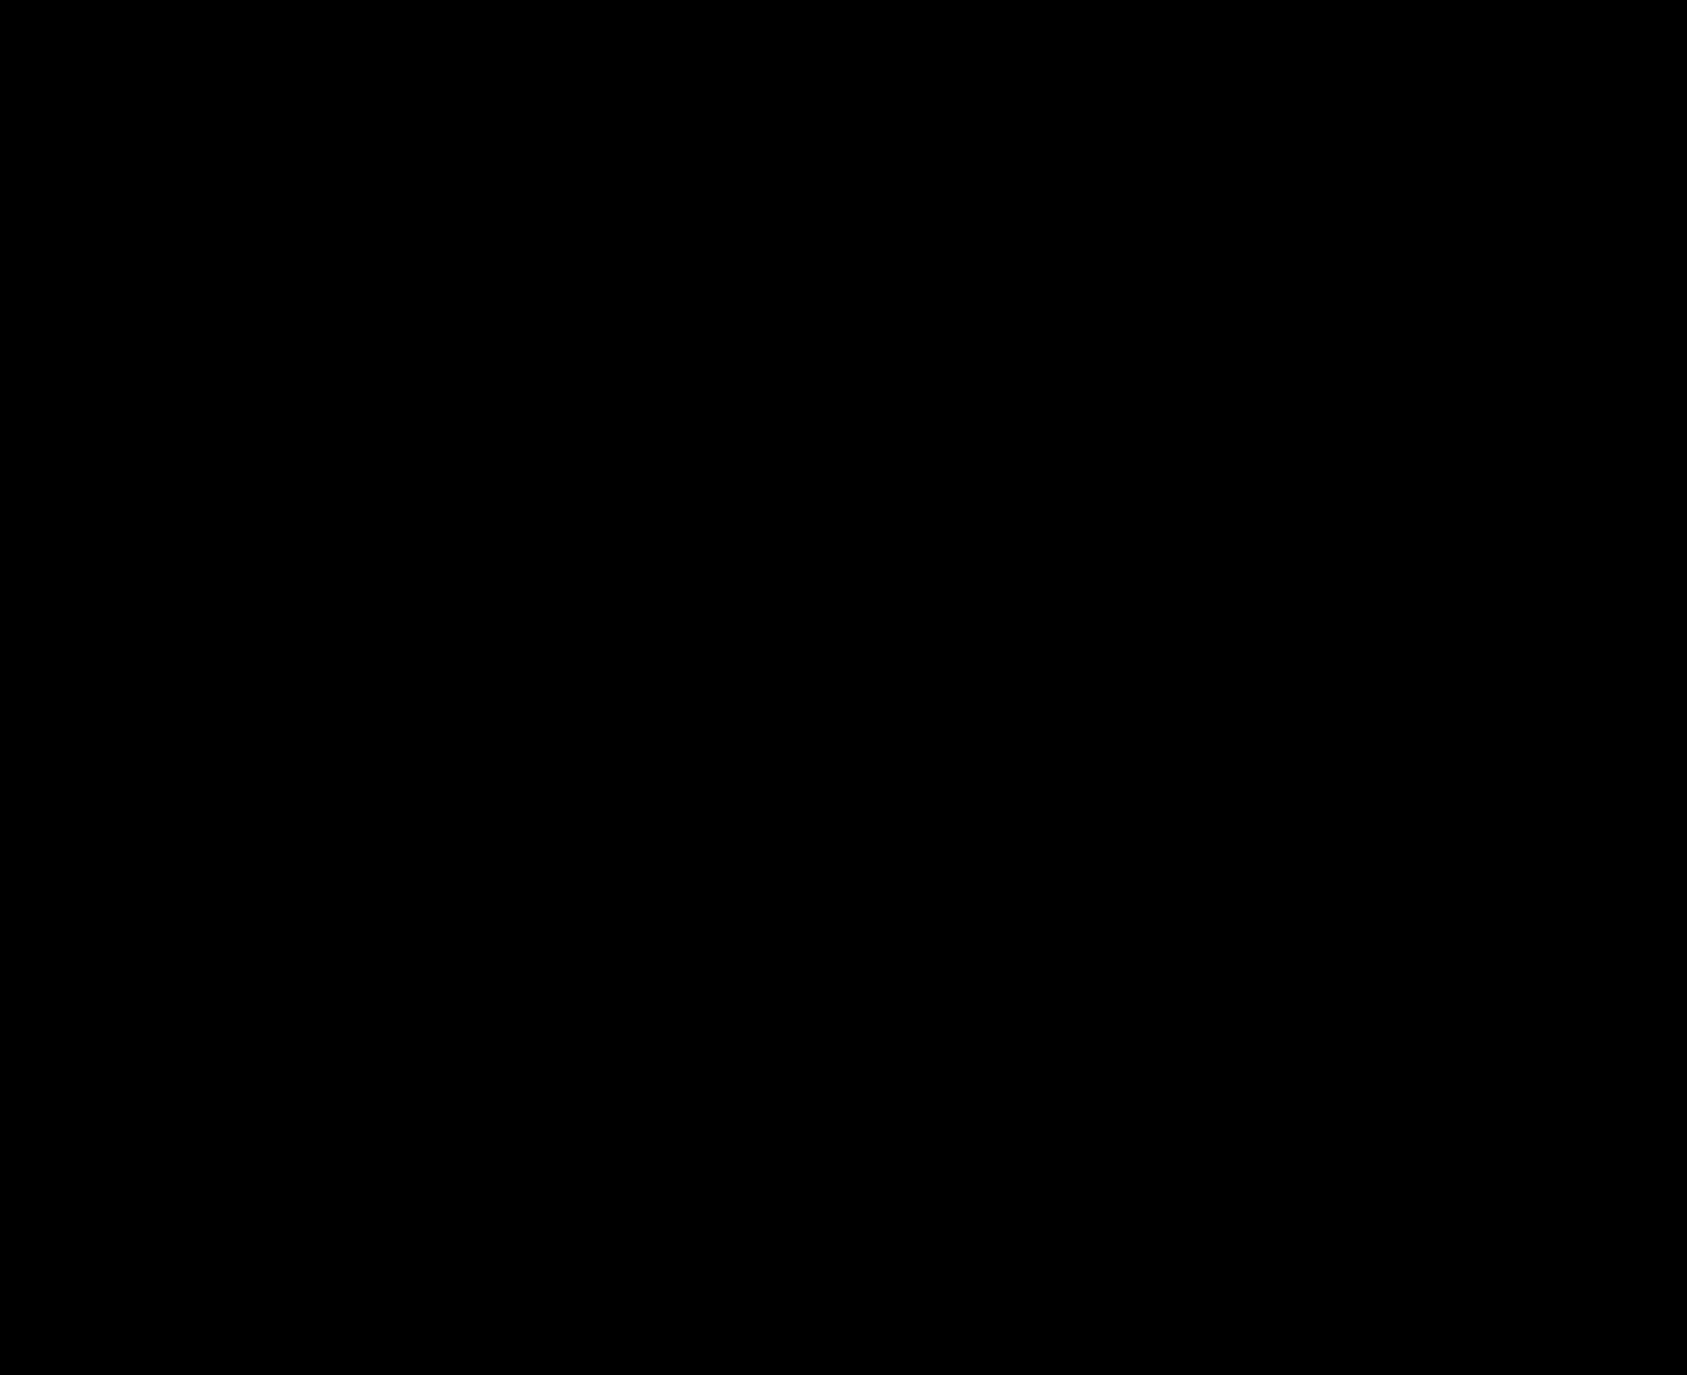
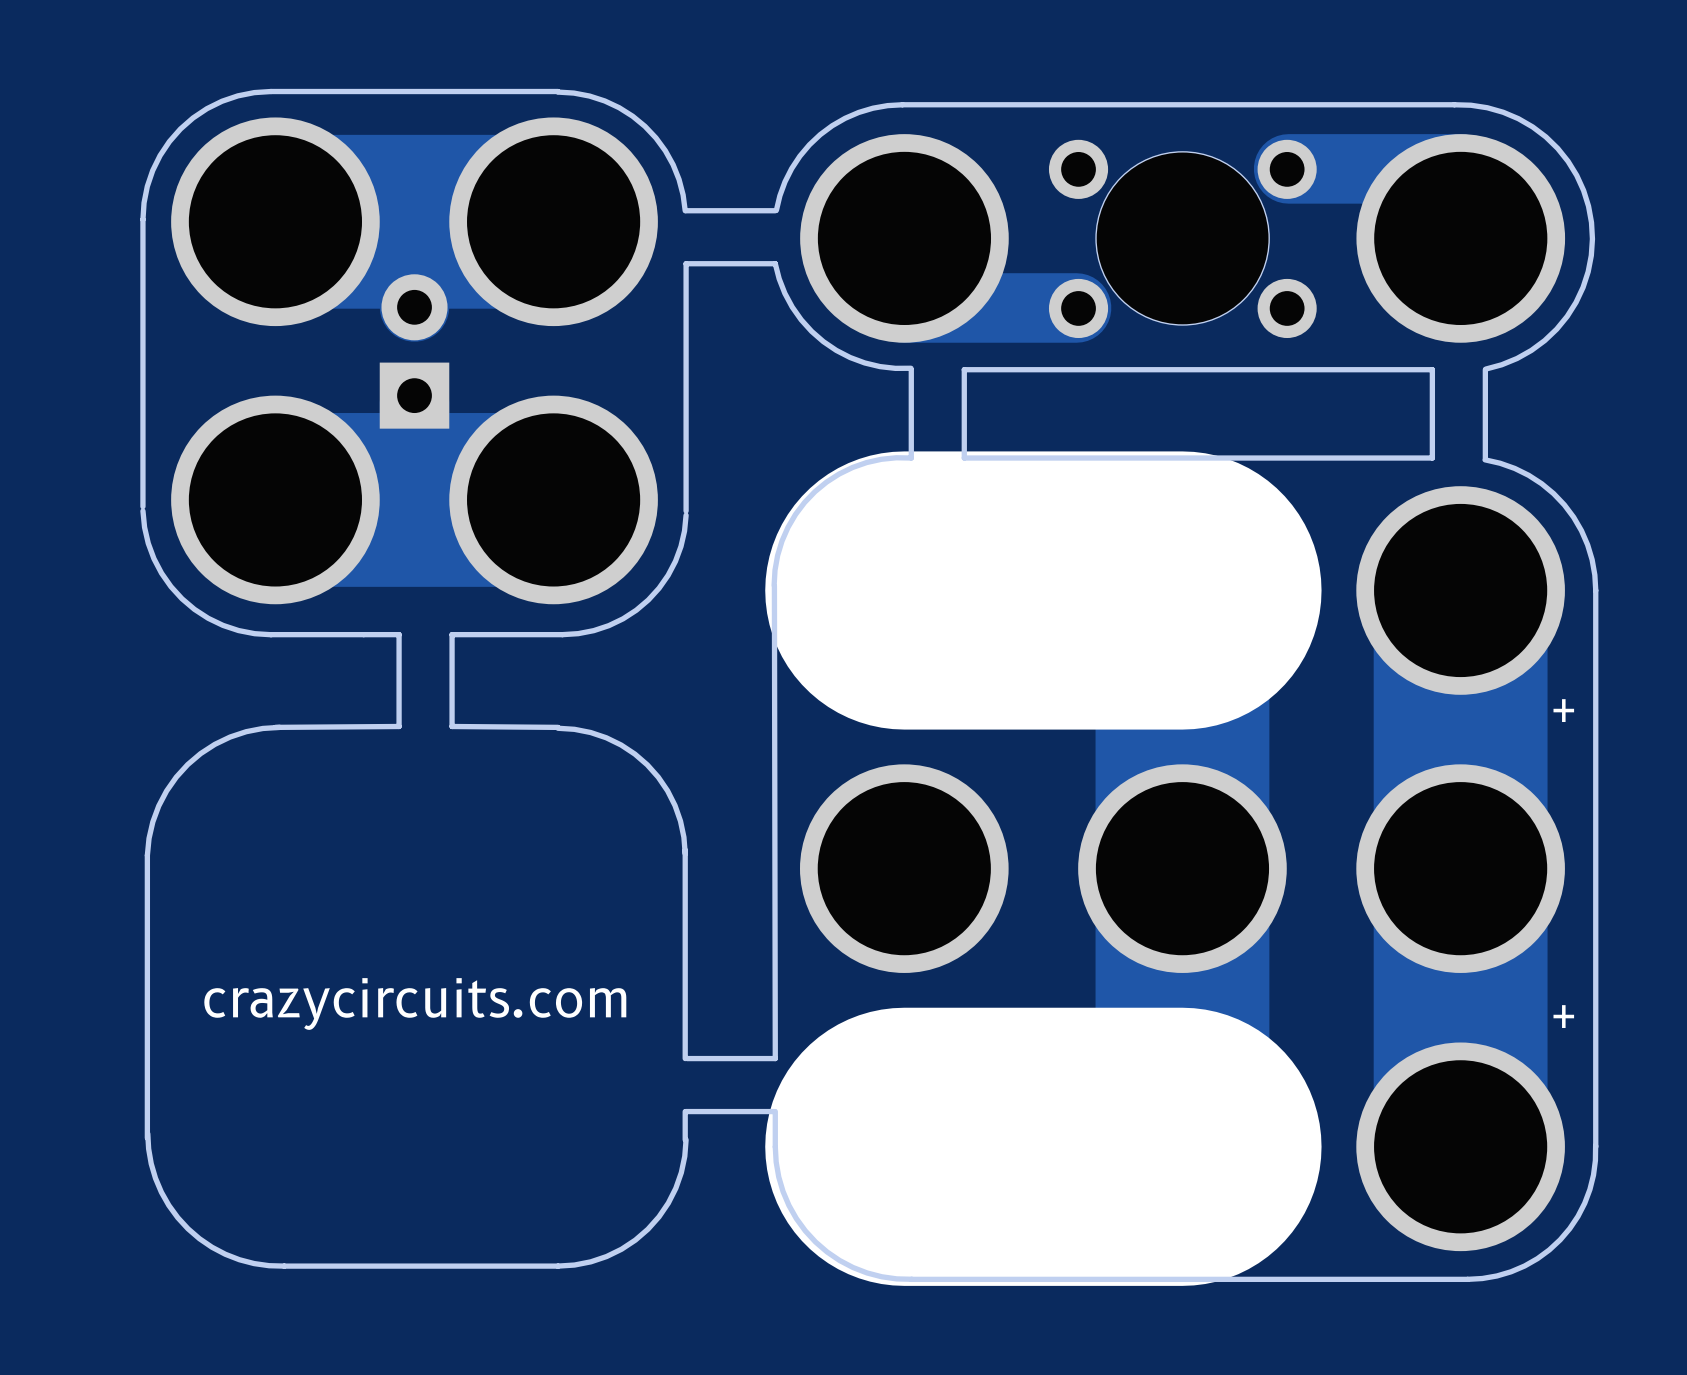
board edge: none -> (558, 91) (254, 92) (222, 101) (206, 108) (180, 129) (160, 155) (152, 170) (144, 202) (142, 506)
board edge: none -> (558, 92) (589, 96) (604, 100) (632, 116) (645, 126) (665, 150) (673, 164) (679, 179) (685, 210)
board edge: none -> (775, 210) (686, 210)
board edge: none -> (776, 210) (784, 181) (791, 168) (809, 144) (832, 125) (845, 118) (872, 108) (887, 105) (1454, 104) (1487, 107) (1503, 112) (1532, 126) (1545, 136) (1568, 161) (1583, 190) (1588, 206) (1592, 239) (1591, 255) (1583, 287) (1567, 316) (1544, 340) (1531, 350) (1517, 358) (1485, 369)
part: none -> (1182, 238)
part: none -> (414, 360)
board edge: none -> (910, 368) (895, 368) (864, 362) (836, 350) (823, 341) (811, 331) (792, 307) (779, 278) (775, 263) (686, 263) (686, 511)
board edge: none -> (911, 369) (911, 458) (881, 459) (852, 467) (839, 474) (814, 491) (795, 514) (781, 541) (777, 555) (774, 585)
board edge: none -> (1432, 369) (1432, 458) (964, 458) (964, 369) (1432, 369)
board edge: none -> (1485, 369) (1485, 458)
board edge: none -> (1485, 459) (1514, 468) (1541, 483) (1553, 493) (1573, 517) (1581, 530) (1592, 559) (1594, 575) (1595, 1146)
board edge: none -> (142, 511) (148, 543) (161, 573) (181, 598) (208, 618) (223, 625) (254, 633) (399, 634) (399, 726) (275, 727)
board edge: none -> (686, 515) (680, 546) (668, 575) (648, 599) (623, 618) (608, 625) (578, 633) (452, 634) (452, 726) (558, 727)
board edge: none -> (774, 586) (775, 1058) (686, 1058)
board edge: none -> (279, 727) (246, 731) (230, 737) (200, 753) (187, 764) (166, 791) (158, 806) (152, 821) (147, 855)
board edge: none -> (558, 728) (574, 729) (606, 737) (621, 745) (647, 764) (658, 777) (675, 805) (680, 821) (685, 853)
board edge: none -> (685, 850) (685, 1058)
board edge: none -> (147, 855) (147, 1138)
part: none -> (1165, 868)
part: none -> (415, 1004)
board edge: none -> (685, 1111) (685, 1139)
board edge: none -> (774, 1111) (686, 1111)
board edge: none -> (775, 1111) (775, 1146) (778, 1176) (788, 1205) (805, 1230) (827, 1251) (852, 1267) (881, 1276) (911, 1279)
board edge: none -> (147, 1133) (151, 1163) (161, 1192) (177, 1217) (188, 1228) (211, 1247) (239, 1259) (269, 1265) (284, 1266) (558, 1266) (590, 1261) (606, 1256) (635, 1240) (659, 1216) (675, 1188) (681, 1172) (686, 1139)
board edge: none -> (1595, 1145) (1595, 1160) (1589, 1189) (1584, 1203) (1569, 1228) (1549, 1249) (1537, 1258) (1511, 1271) (1496, 1275) (1467, 1279) (911, 1279)

